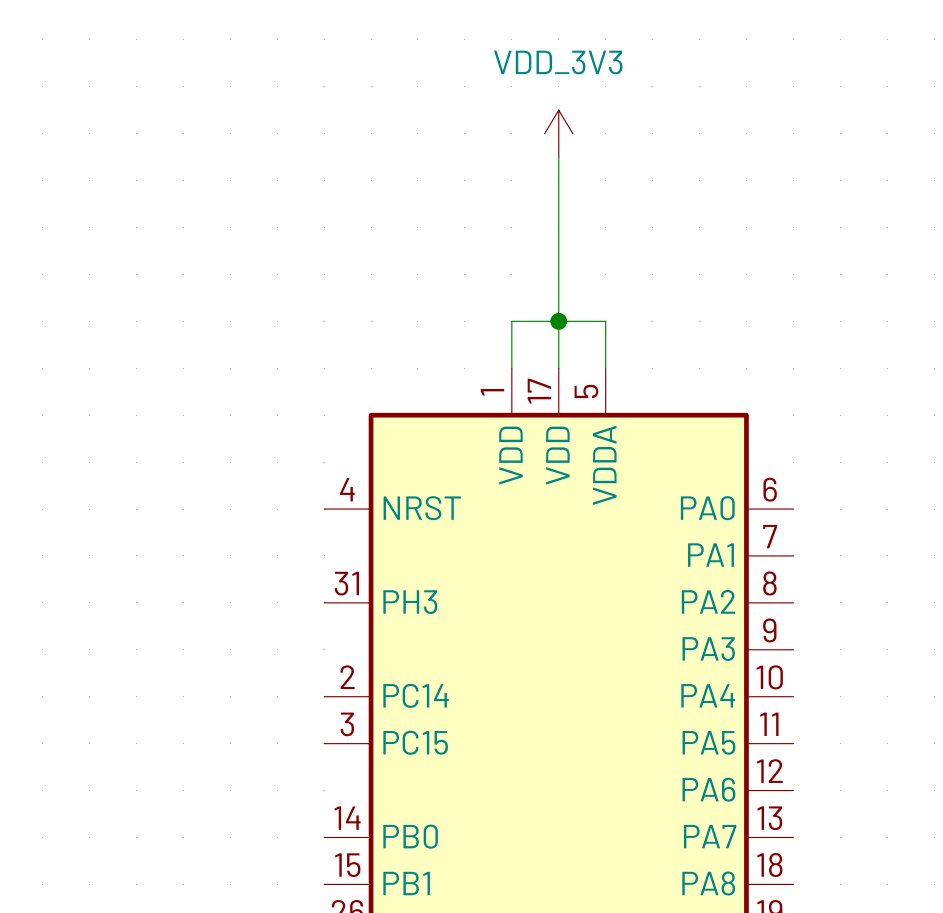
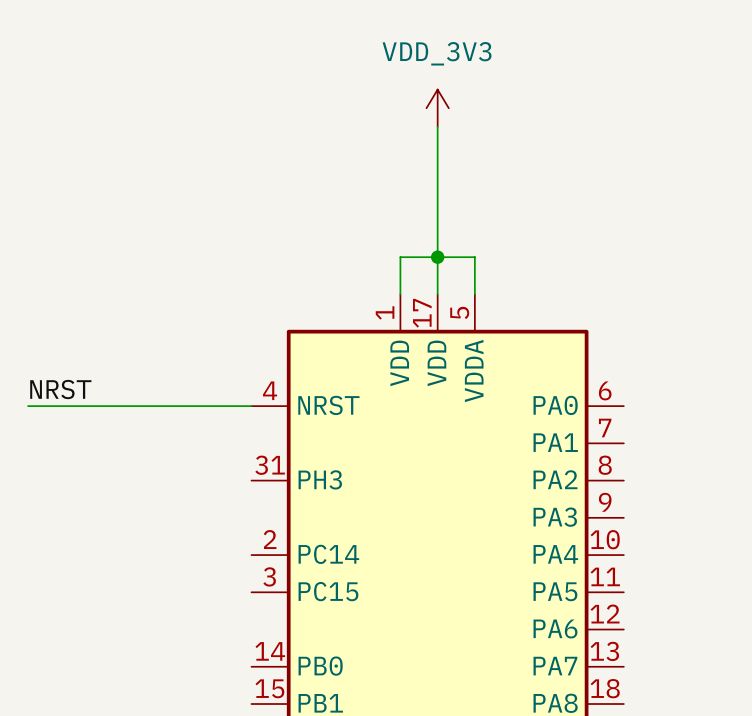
label: none -> NRST (60, 389)
wire: none -> (28, 406) (251, 406)

